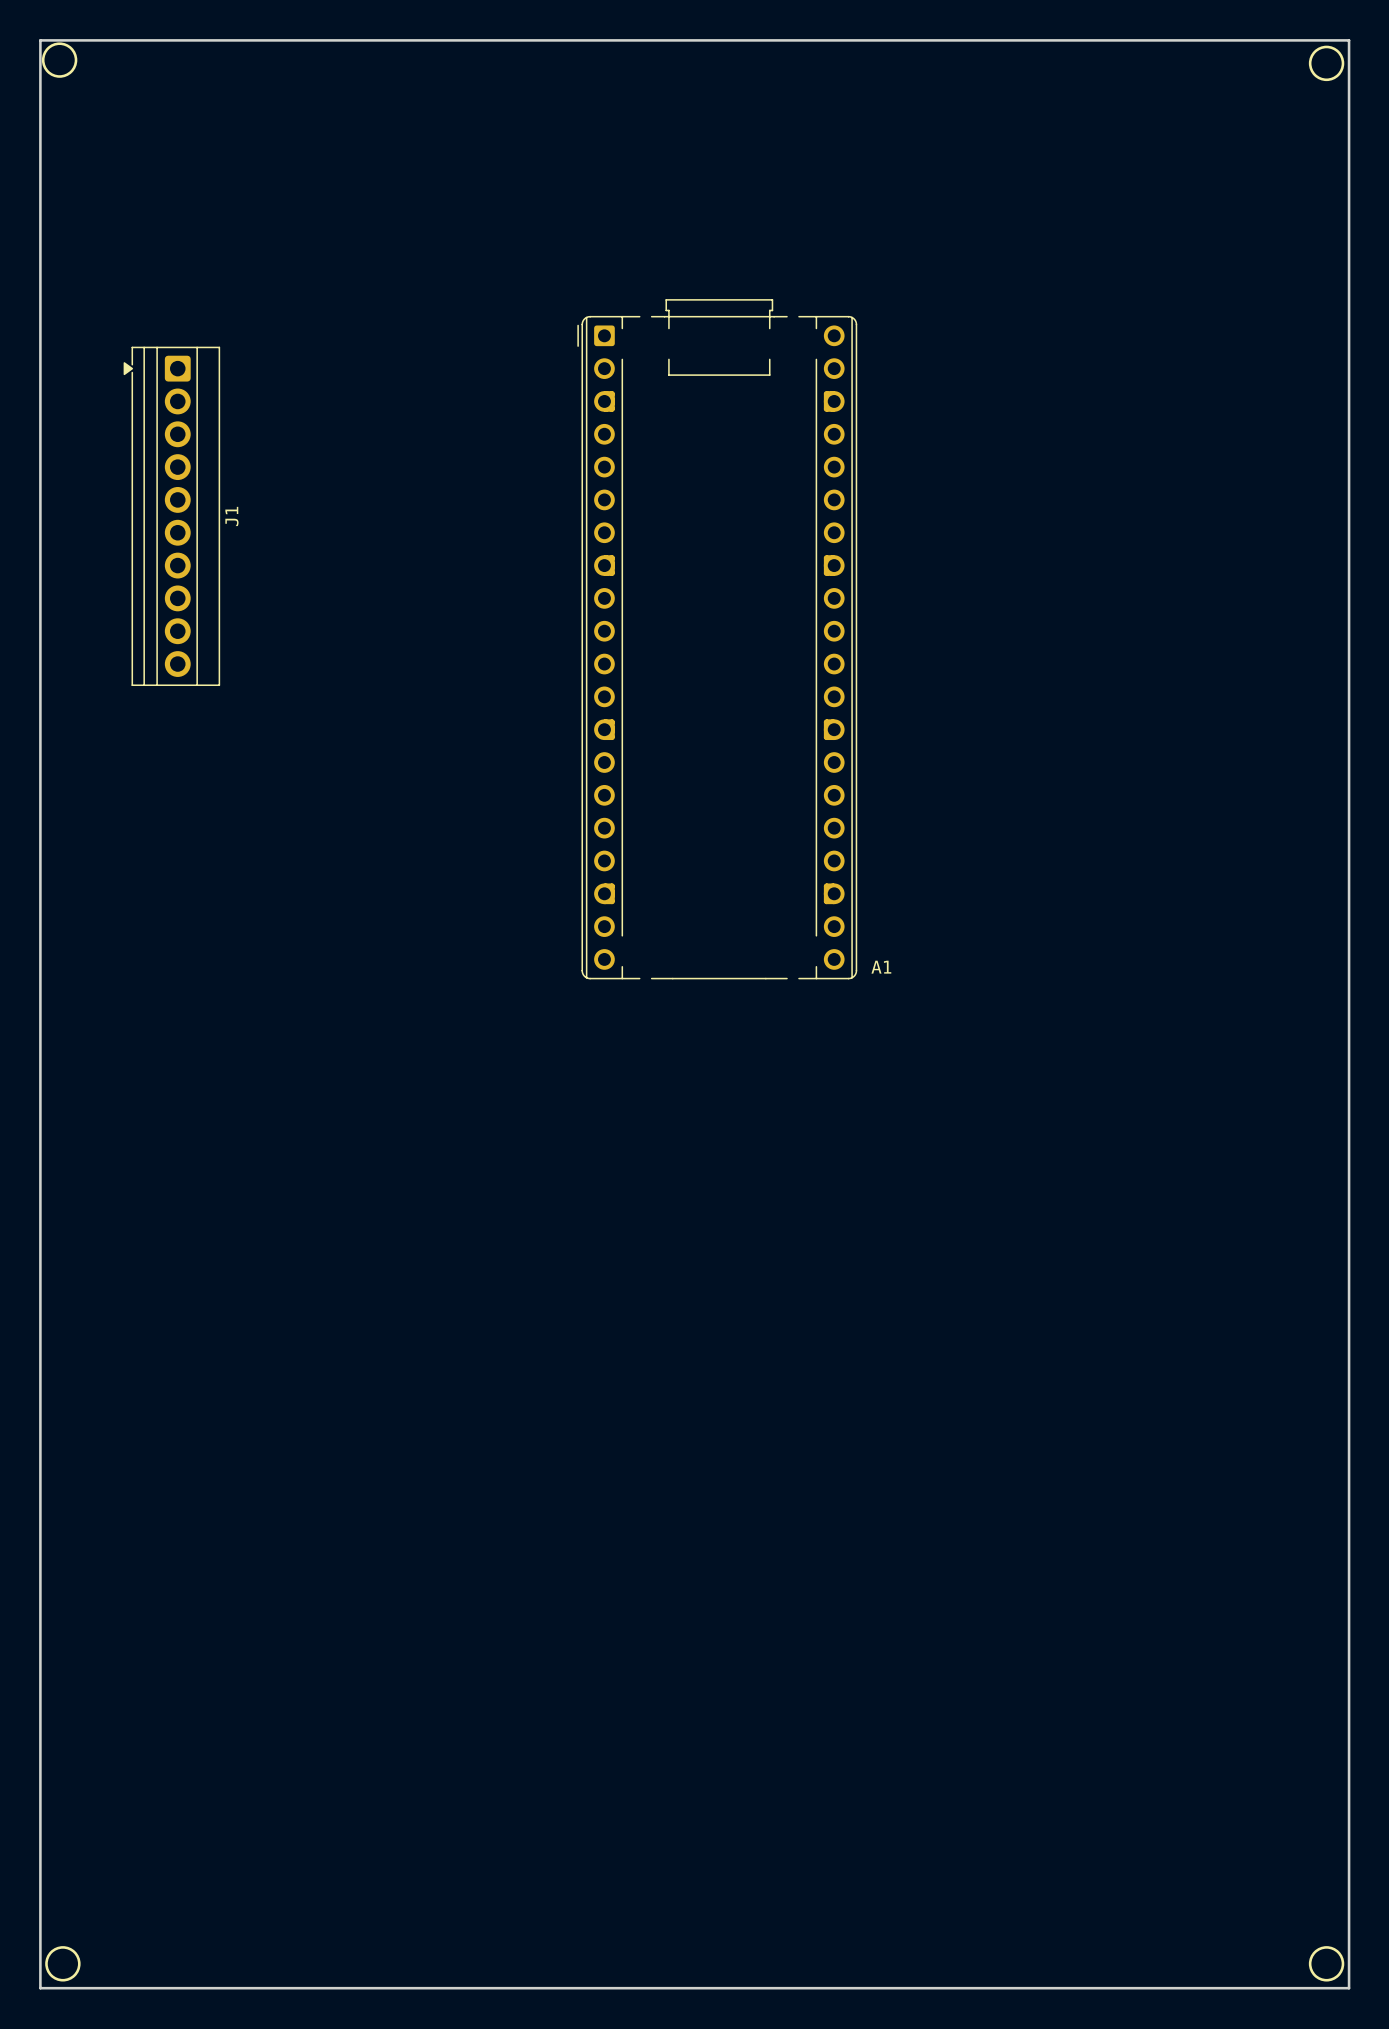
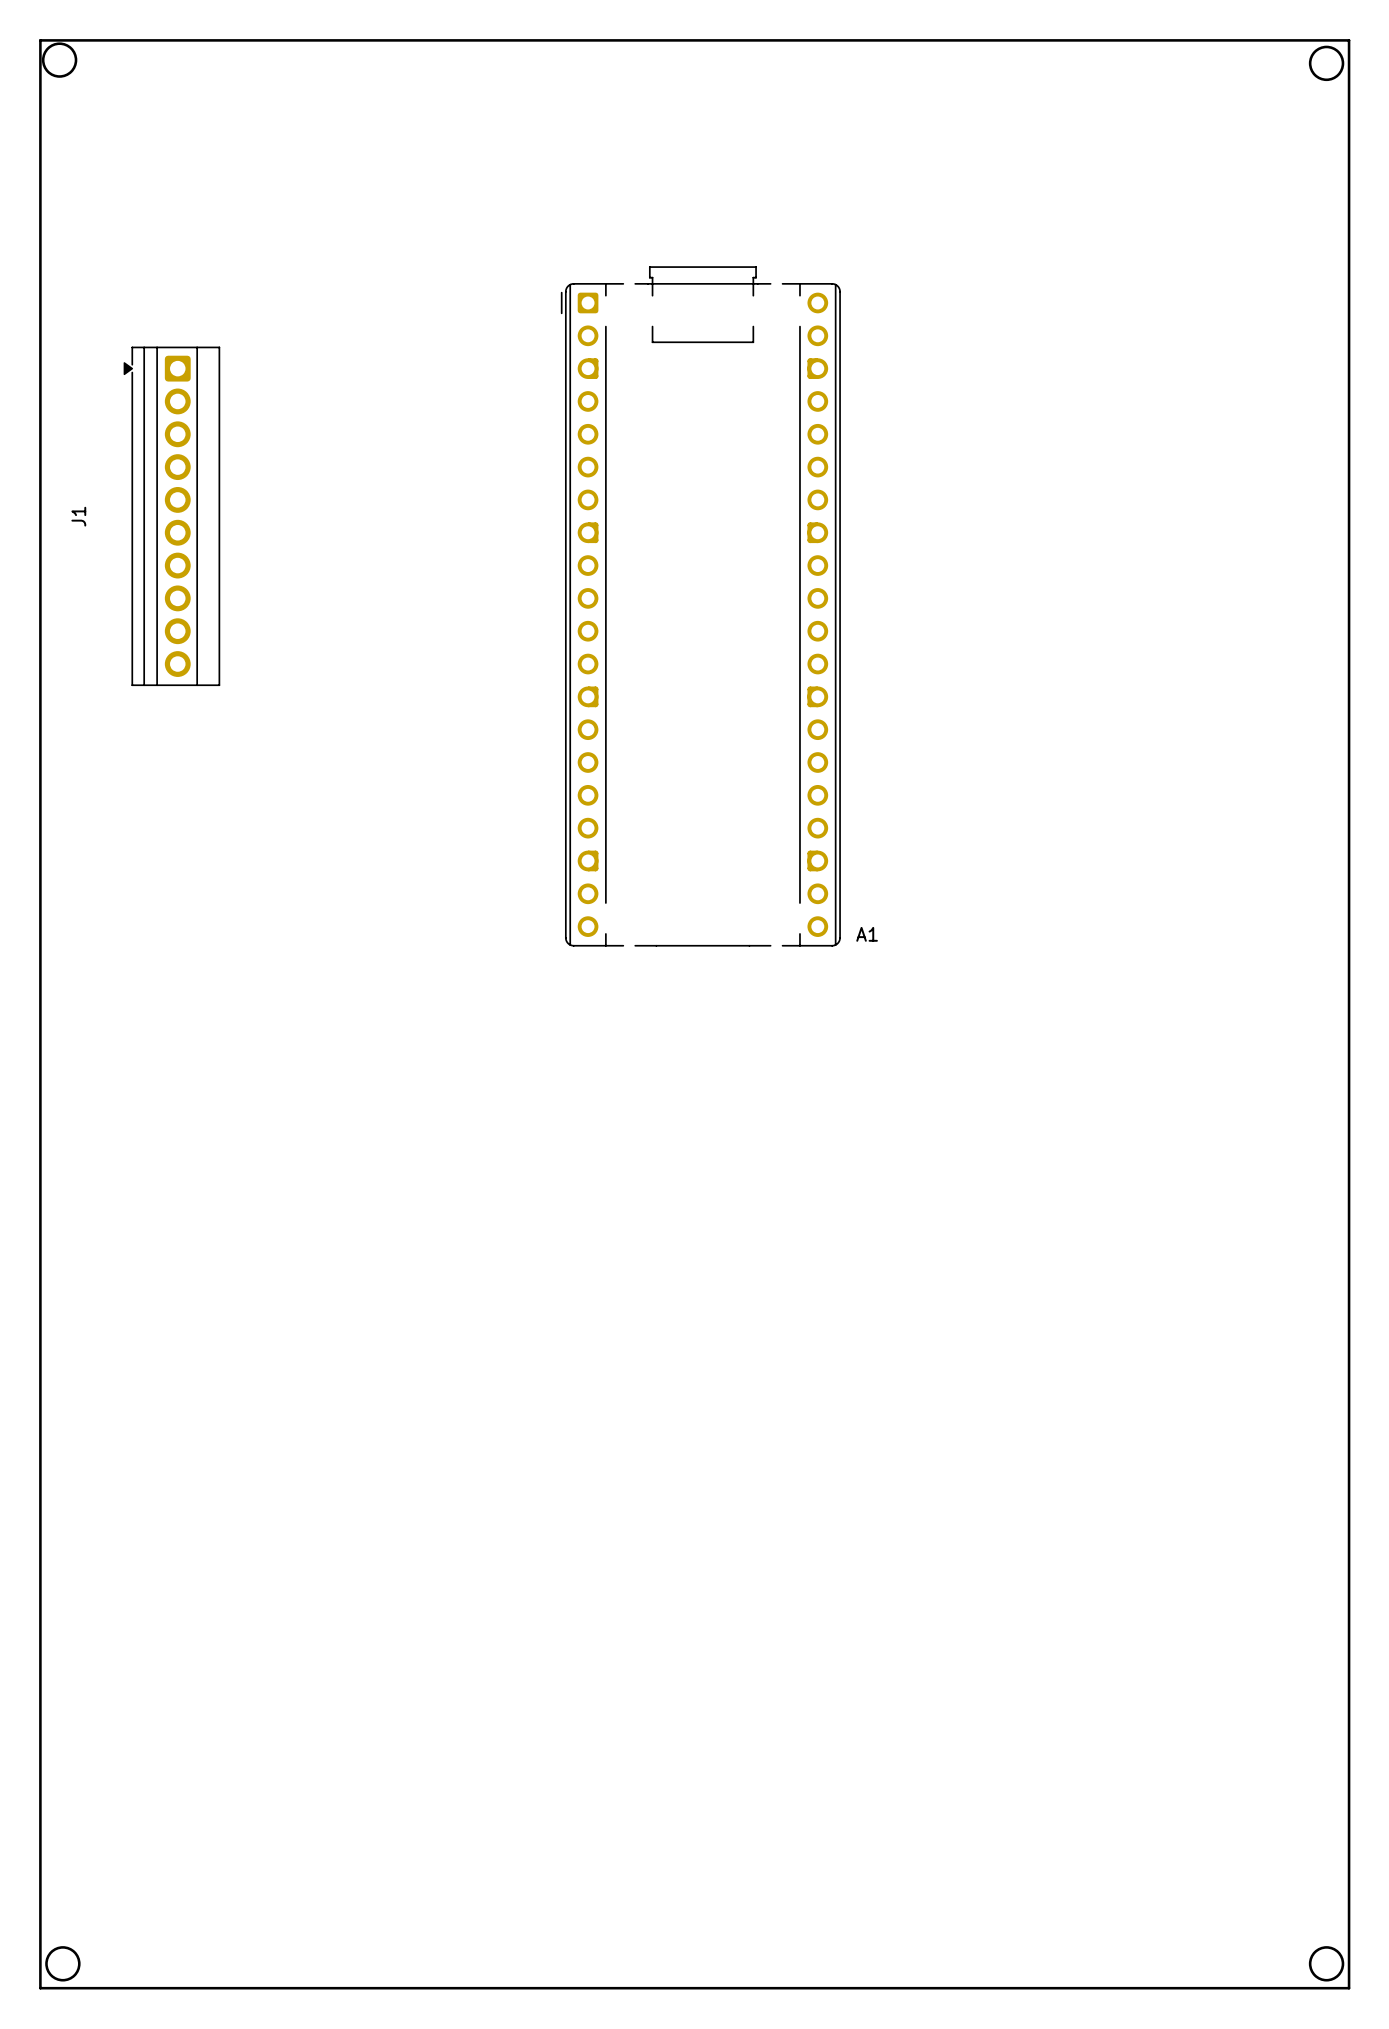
J1 name position: J1 (231, 516) -> J1 (78, 516)
A1 position: (717, 639) -> (700, 606)

